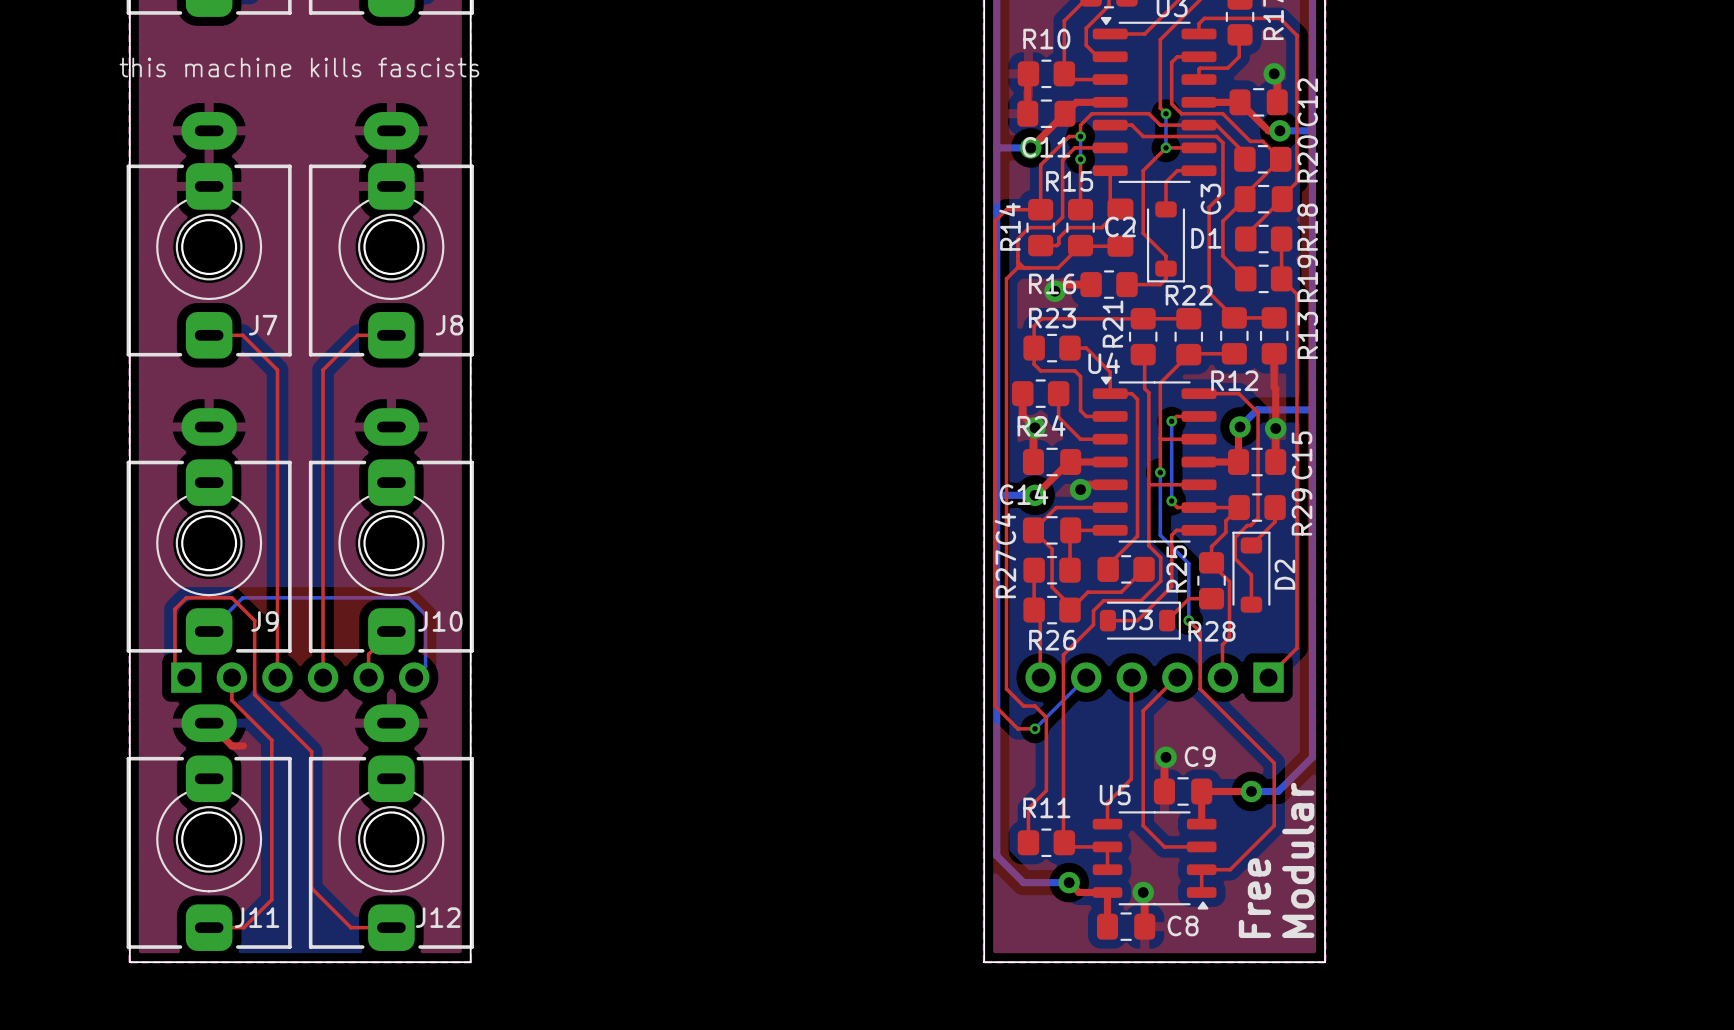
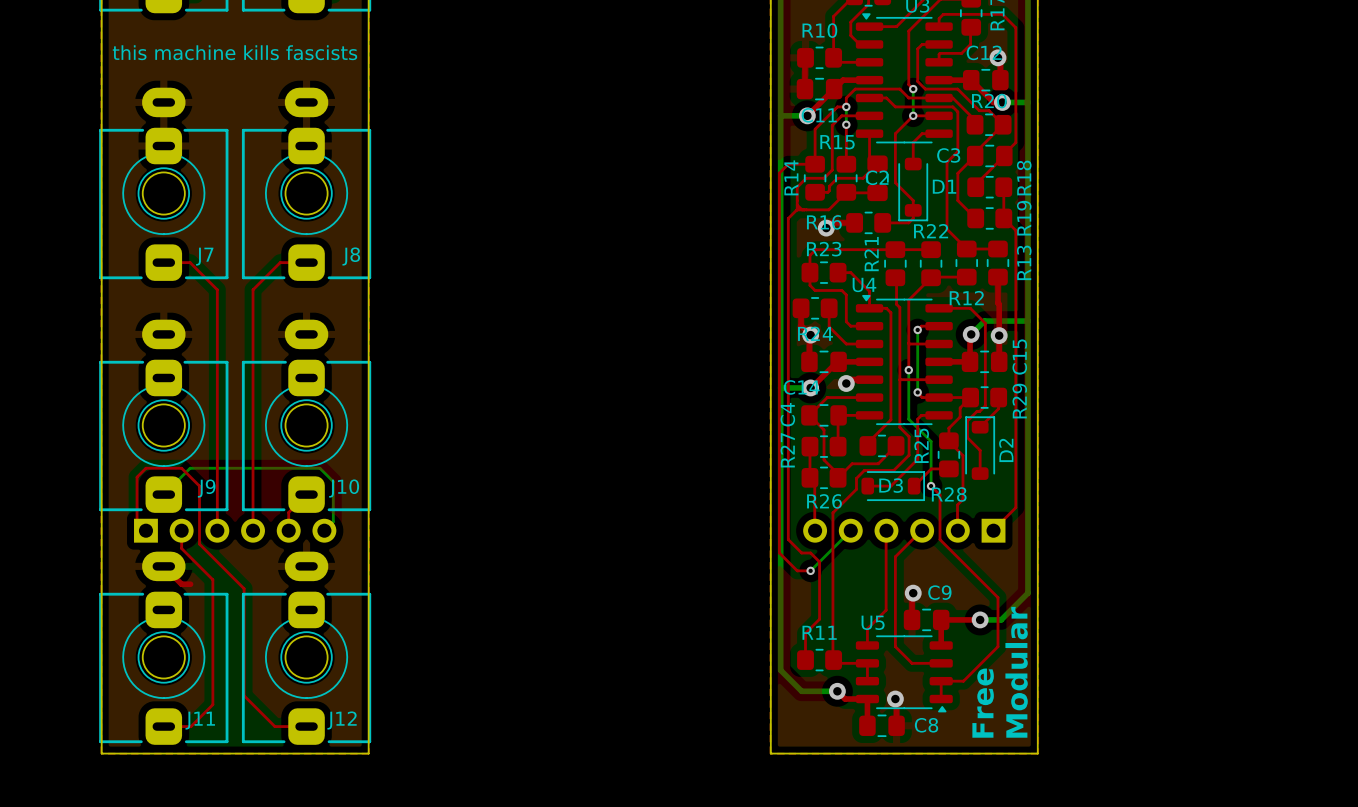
C12 name rotation: 0° (1307, 102) -> 90° clockwise (984, 52)
R20 name rotation: 0° (1307, 158) -> 90° clockwise (989, 101)
C3 name rotation: 0° (1210, 199) -> 90° clockwise (948, 155)

